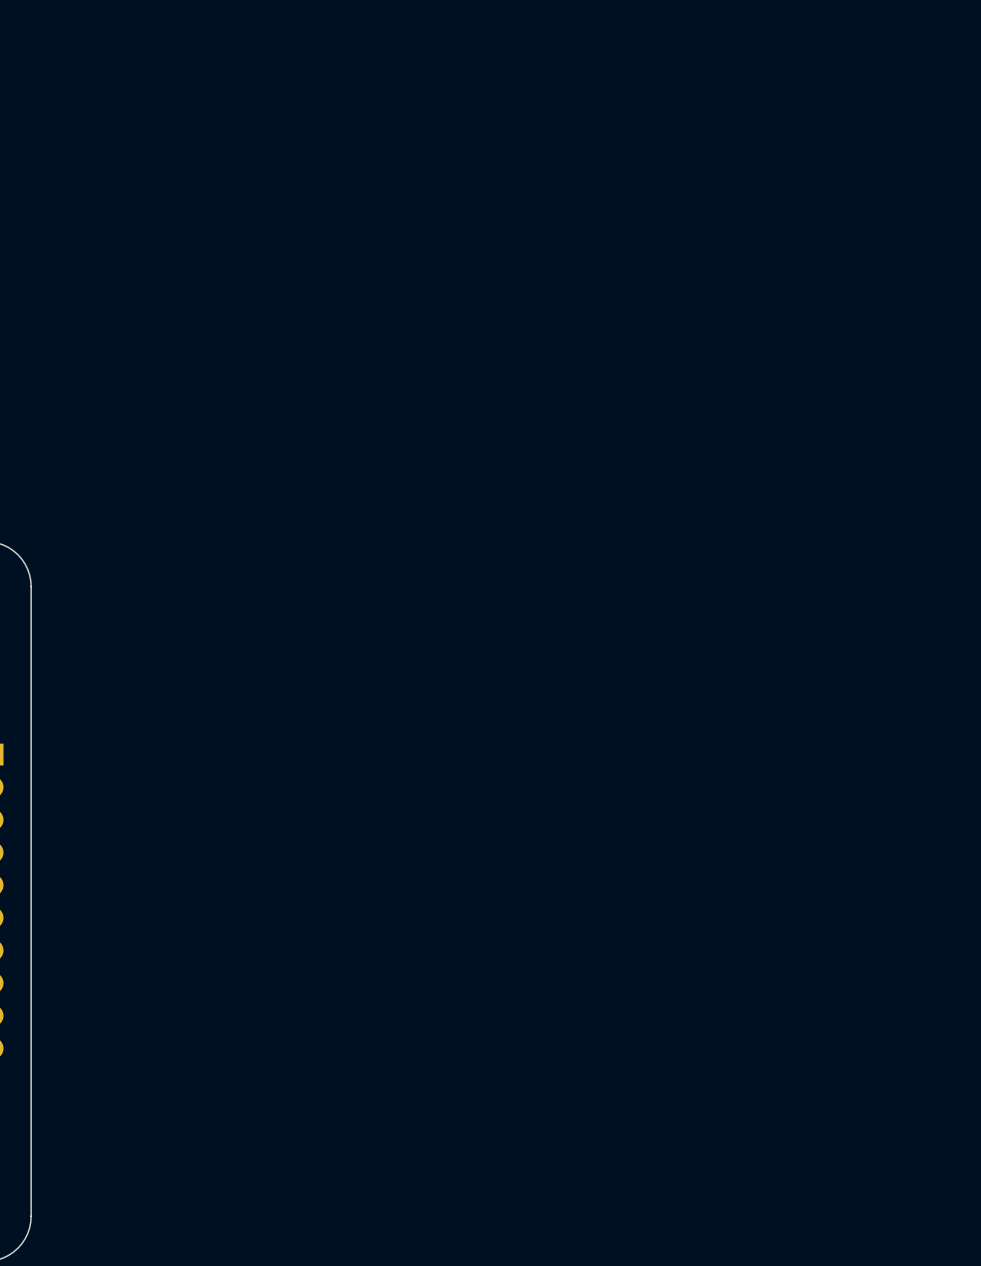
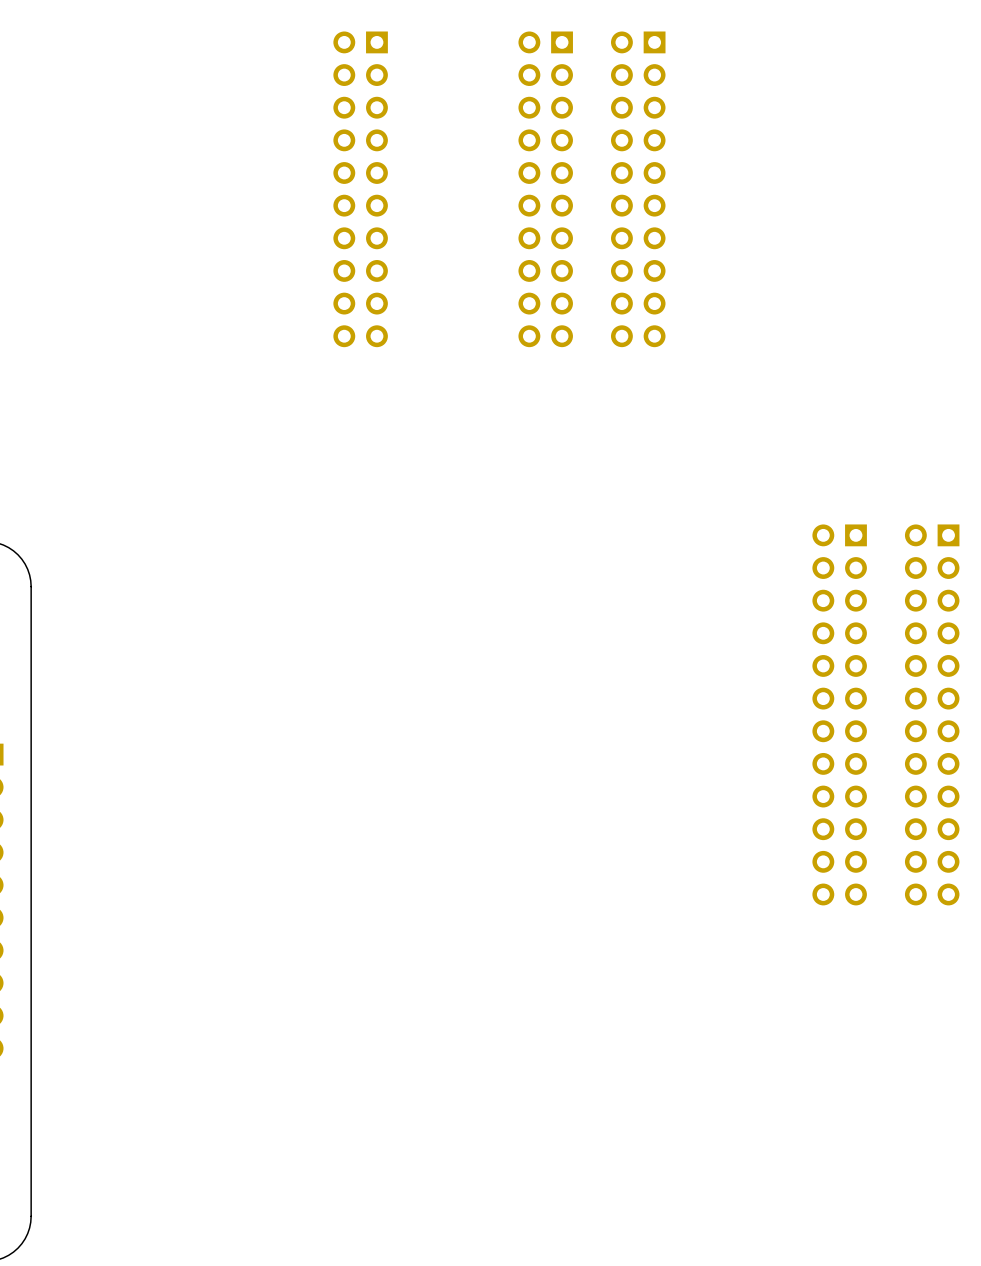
part: none -> (360, 189)
part: none -> (545, 189)
part: none -> (638, 189)
part: none -> (839, 714)
part: none -> (932, 714)

